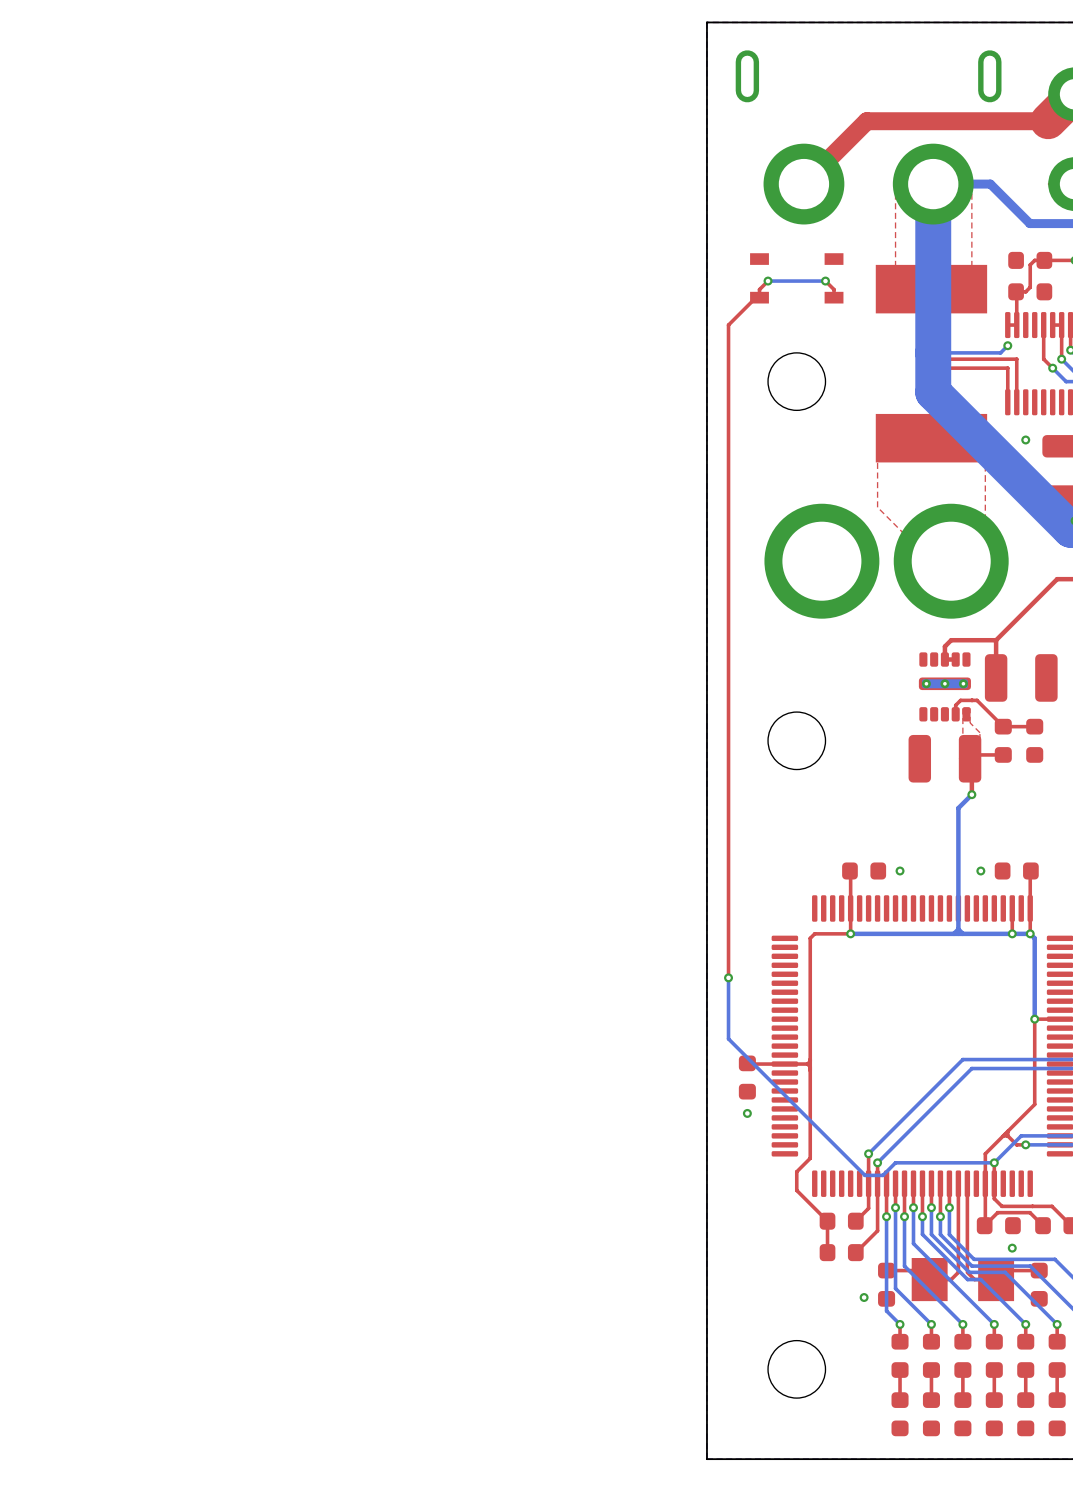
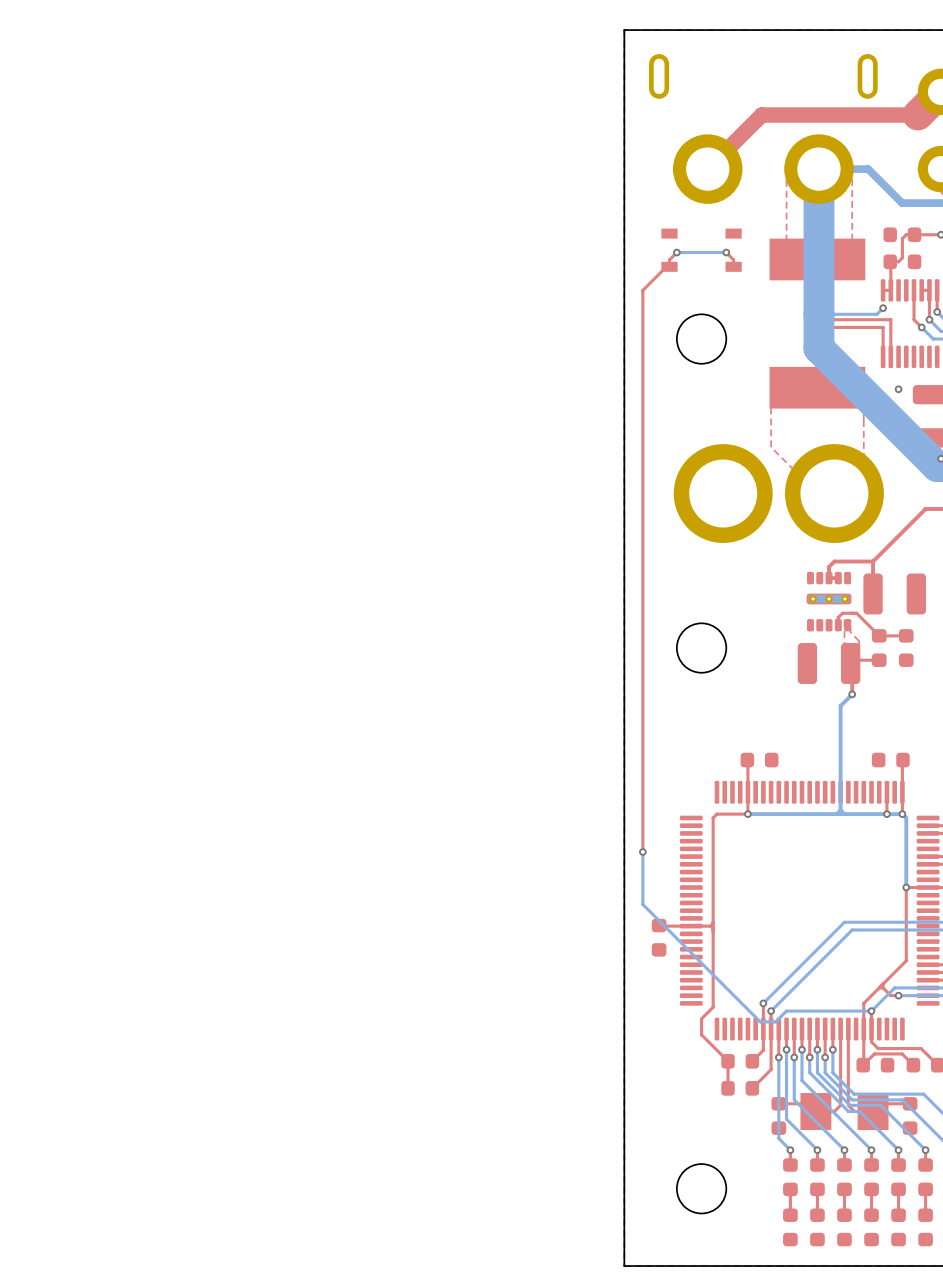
via: (900, 870) -> none
via: (980, 870) -> none
via: (747, 1113) -> none
via: (1012, 1248) -> none
via: (864, 1297) -> none

